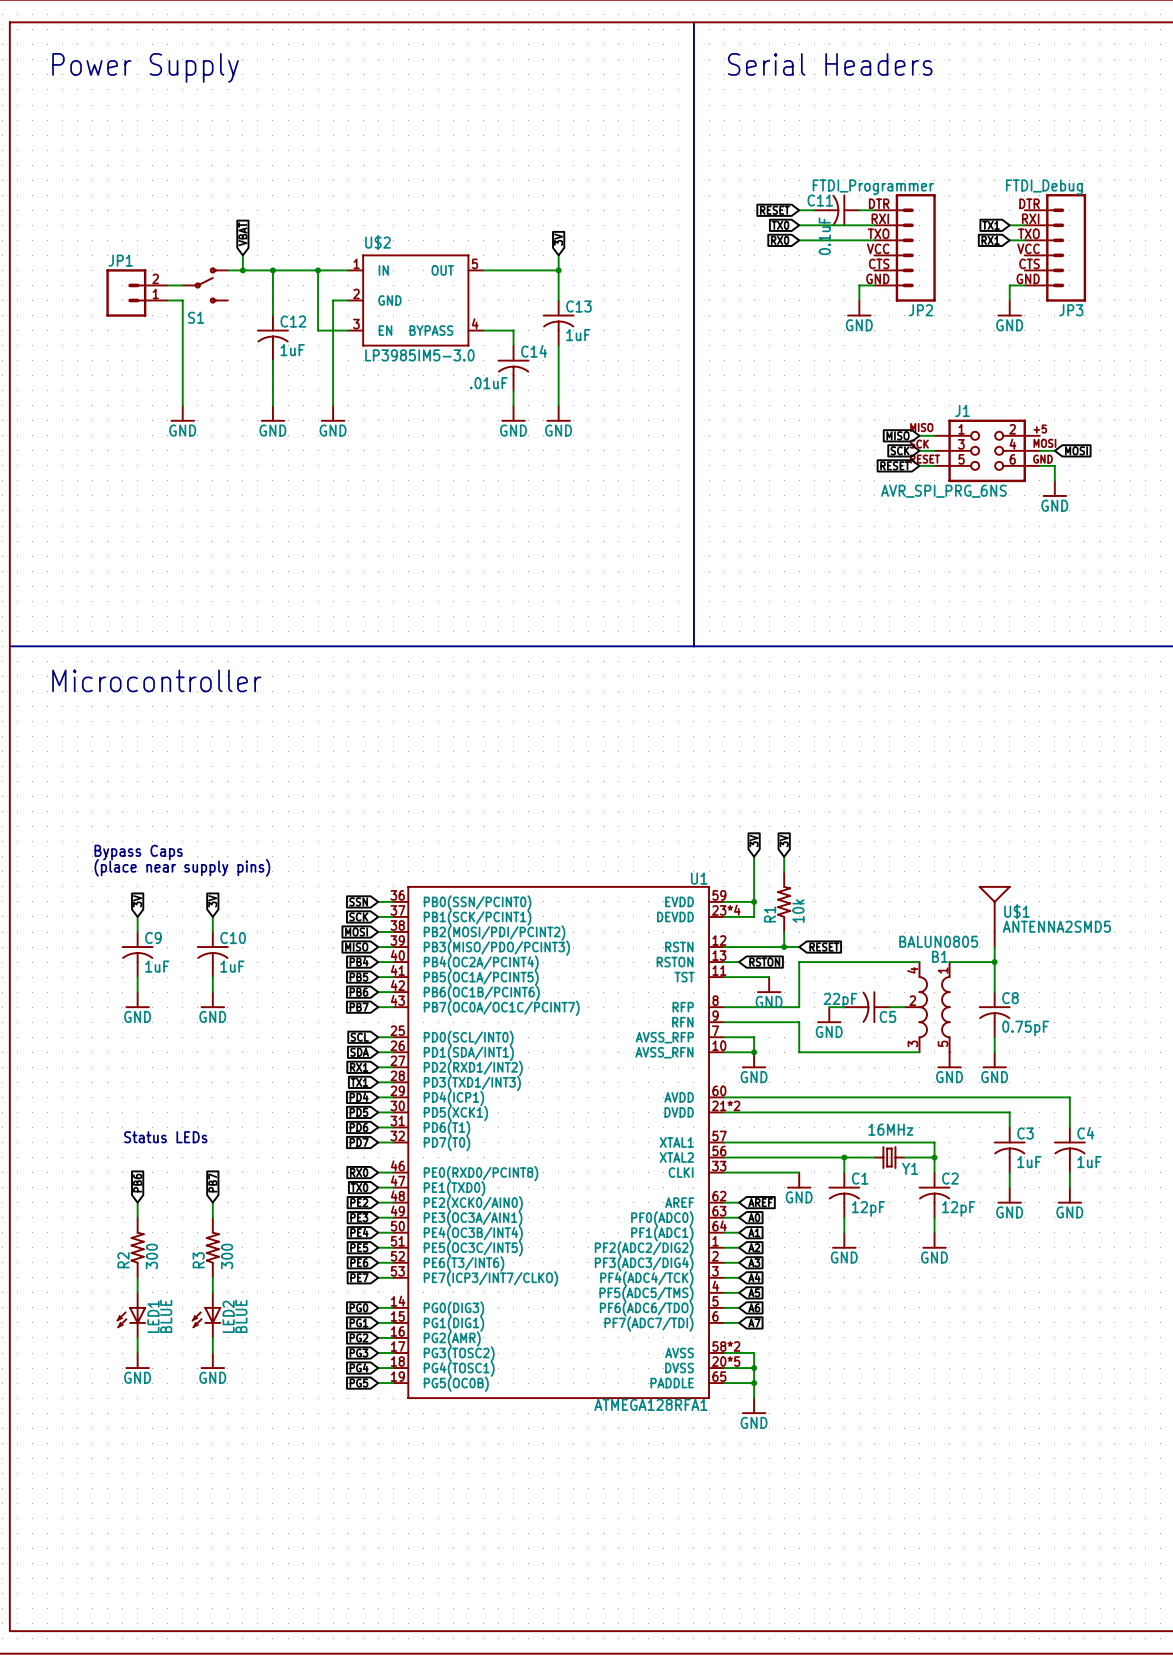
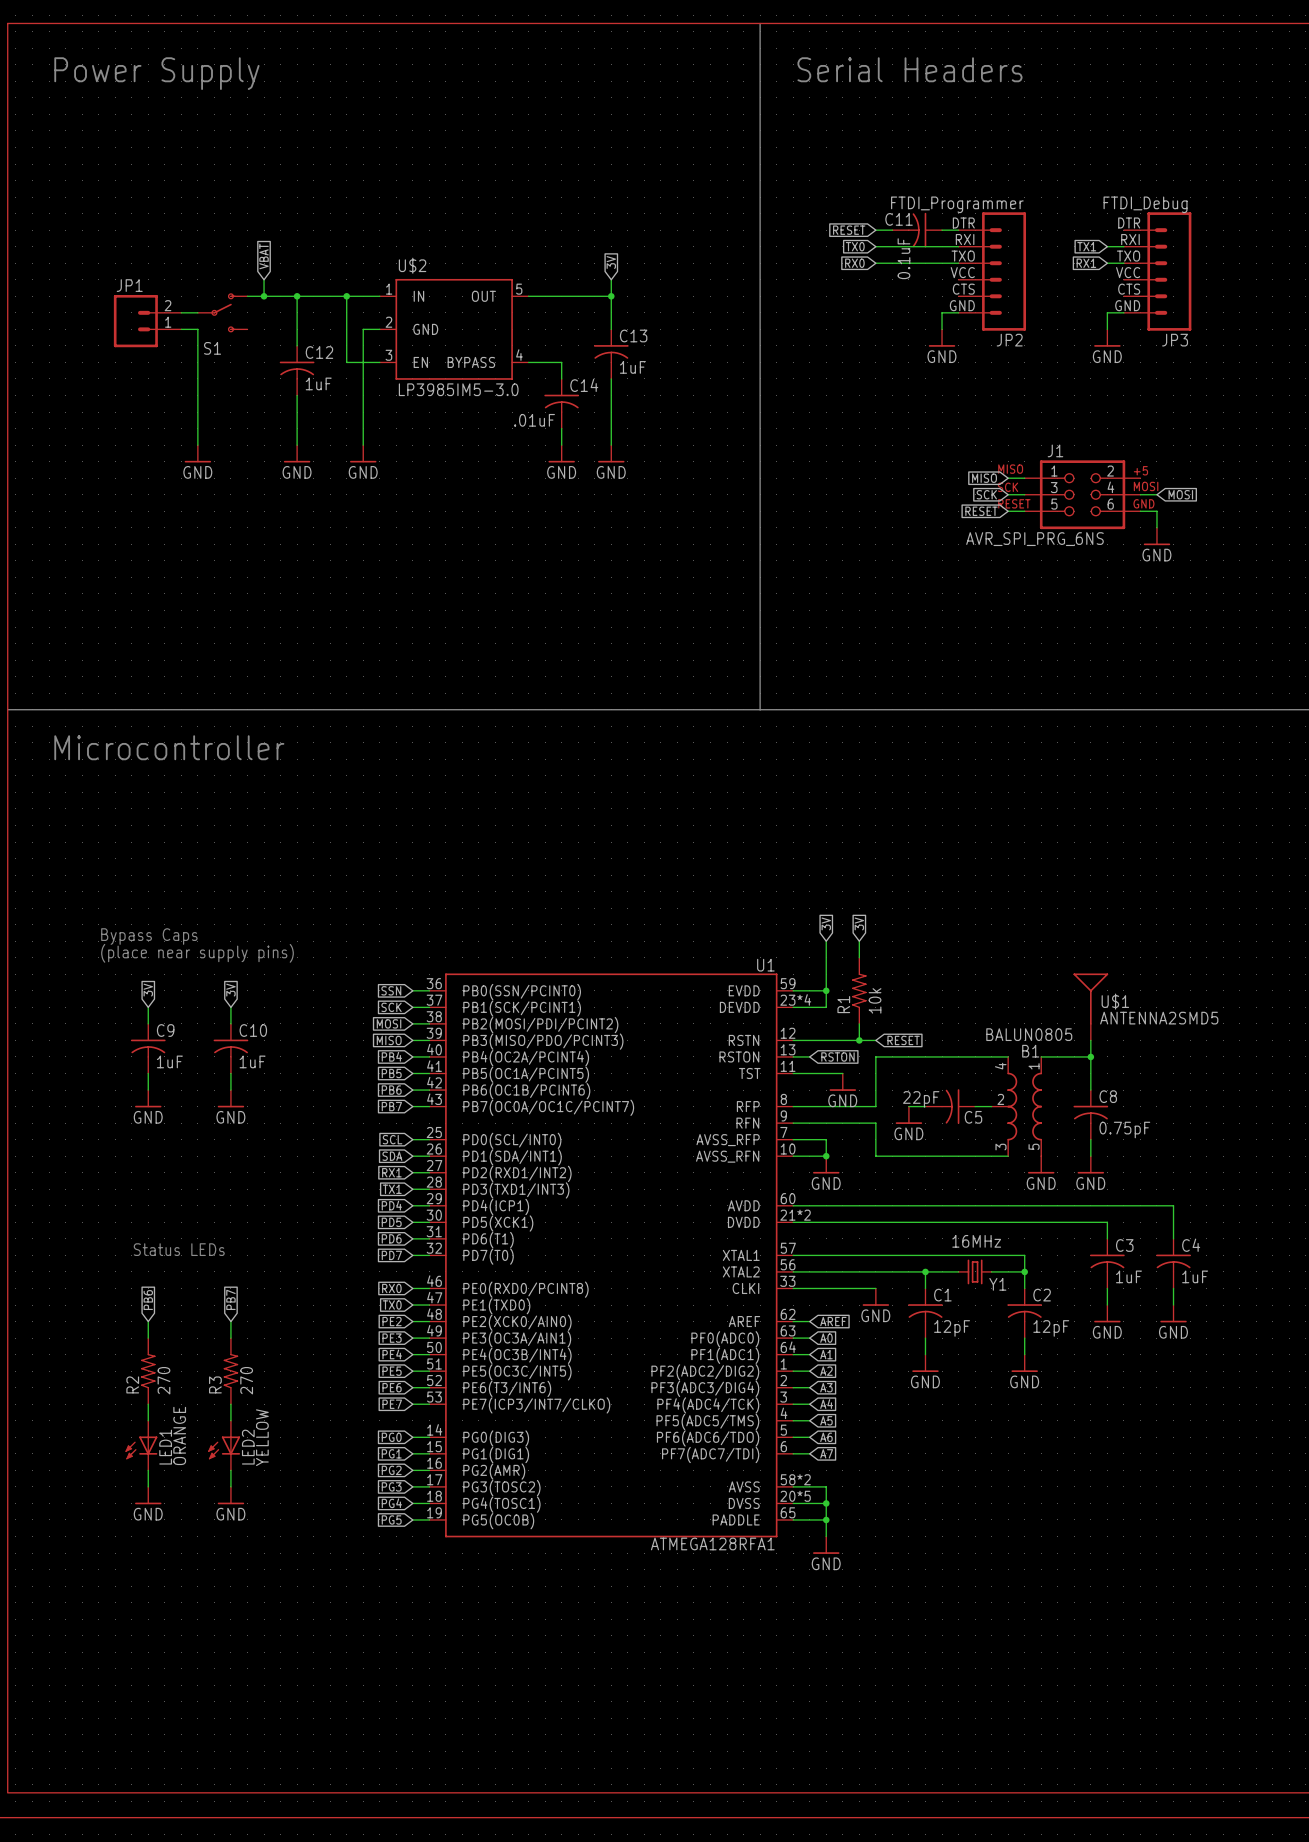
R2 value: 300 (151, 1256) -> 270 (163, 1380)
R3 value: 300 (227, 1256) -> 270 (246, 1380)
LED1 value: BLUE (166, 1316) -> ORANGE (179, 1435)
LED2 value: BLUE (241, 1316) -> YELLOW (262, 1437)

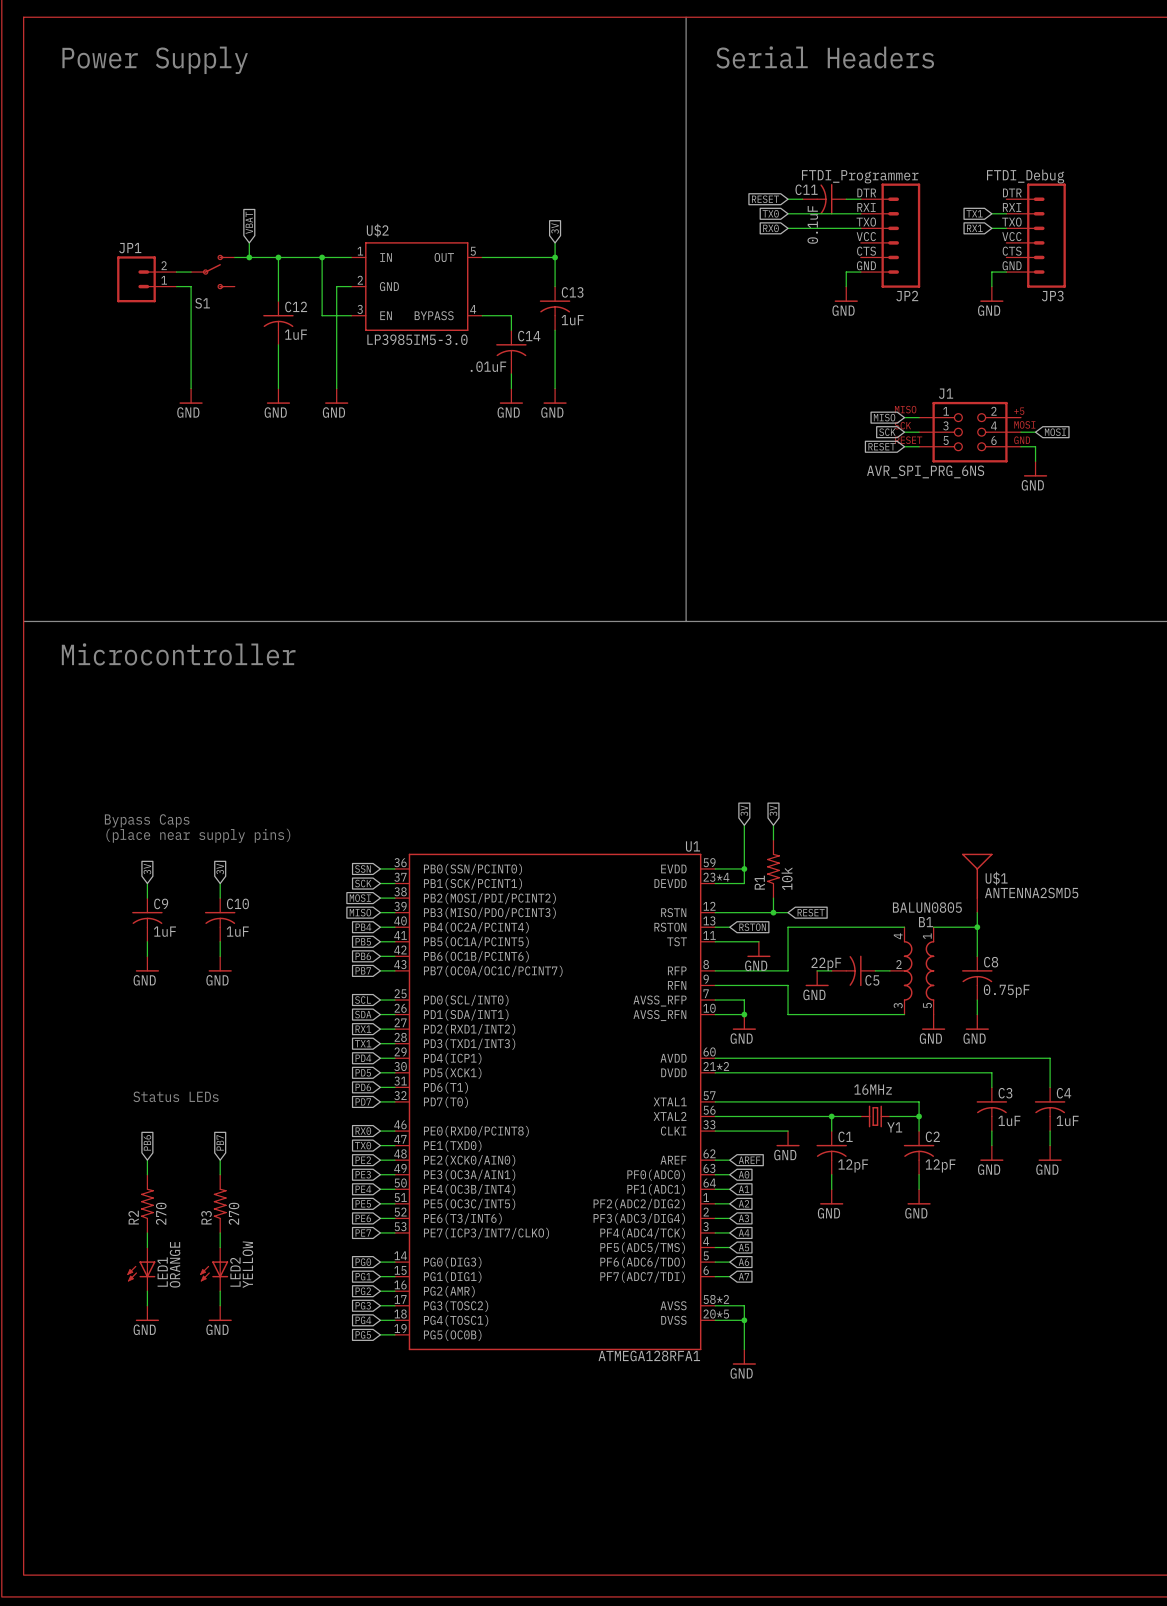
U1 symbol: [429, 973, 794, 1538] -> [394, 853, 716, 1351]
wire: (793, 1519) (826, 1519) -> none
junction: (826, 1519) -> none

